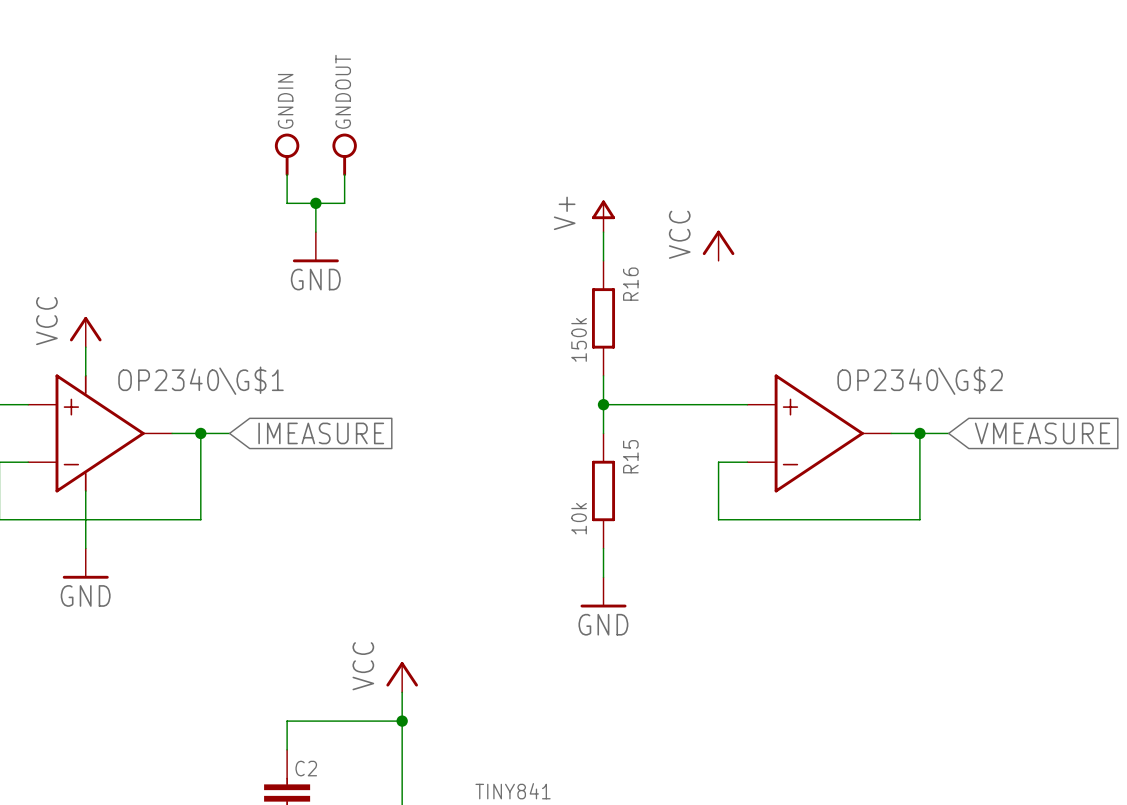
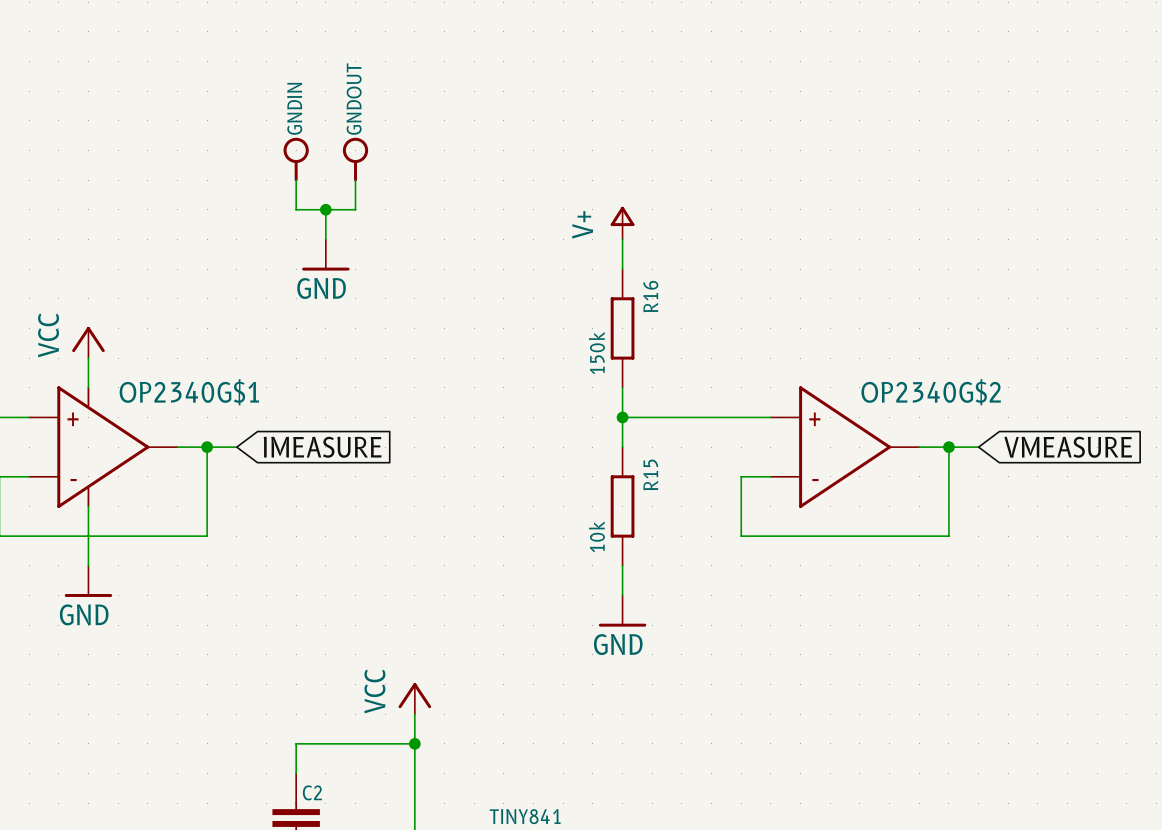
power symbol: VCC (718, 245) -> none
OP2340\G$1 name: OP2340\G$1 (201, 380) -> OP2340G$1 (189, 392)
OP2340\G$2 name: OP2340\G$2 (920, 380) -> OP2340G$2 (931, 392)

